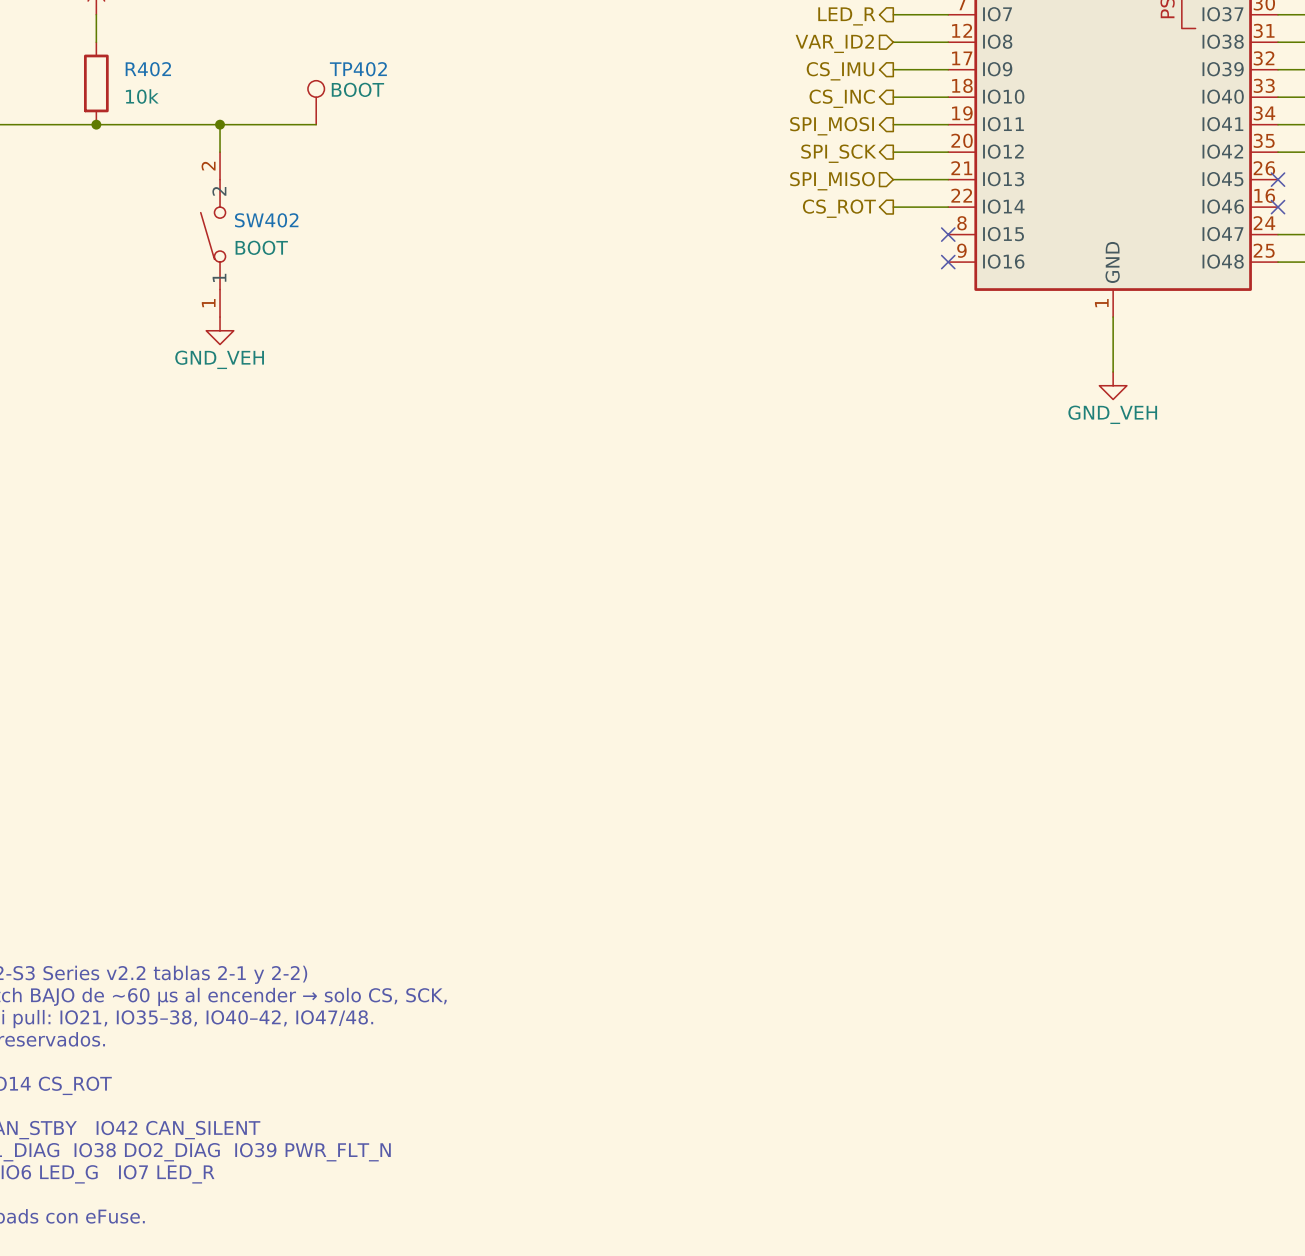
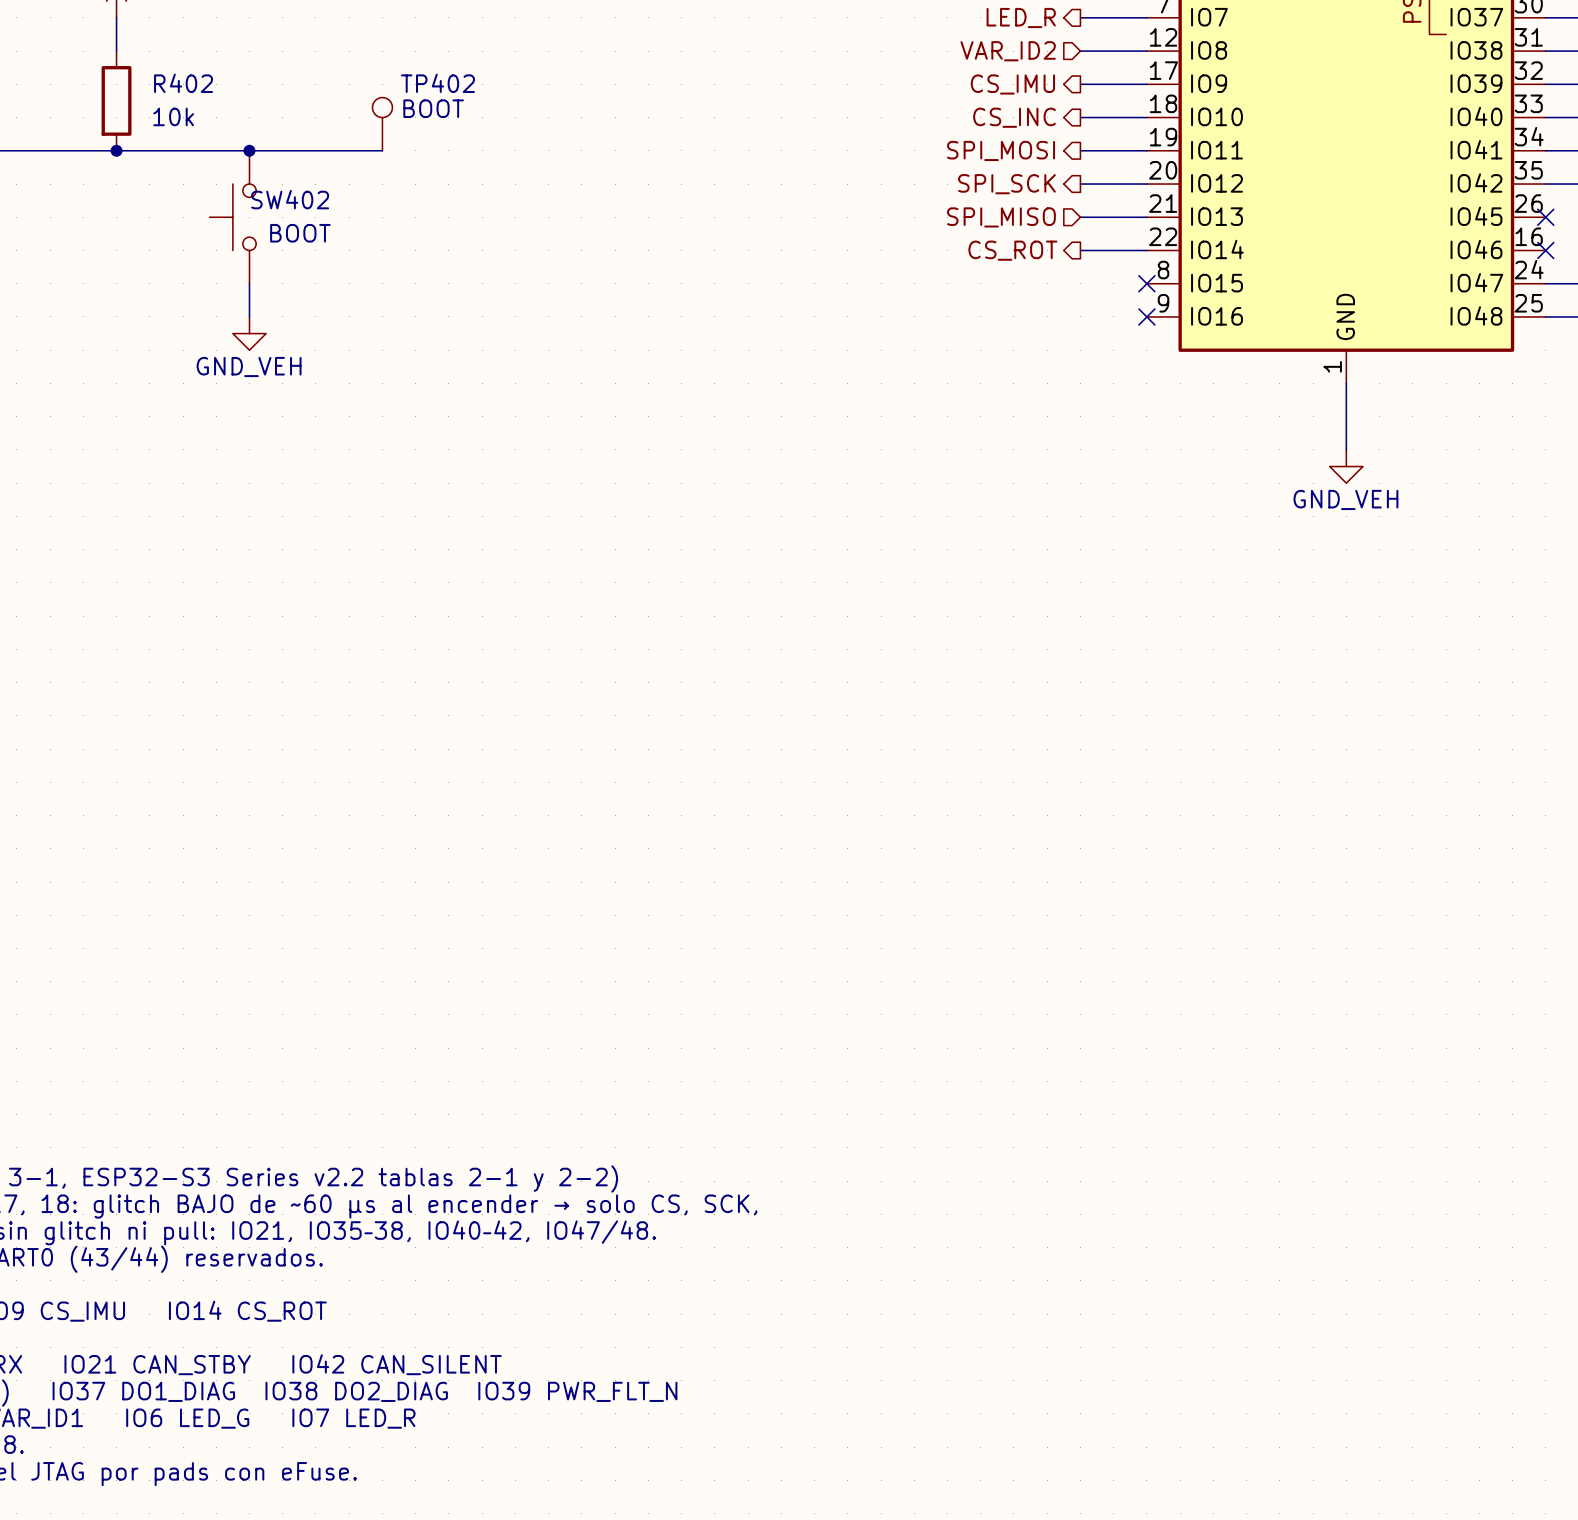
wire: (220, 124) (220, 152) -> (249, 283) (249, 316)
junction position: (220, 124) -> (249, 150)
SW402 symbol: [200, 152, 226, 318] -> [209, 150, 257, 284]
power symbol position: GND_VEH (220, 330) -> GND_VEH (249, 333)

